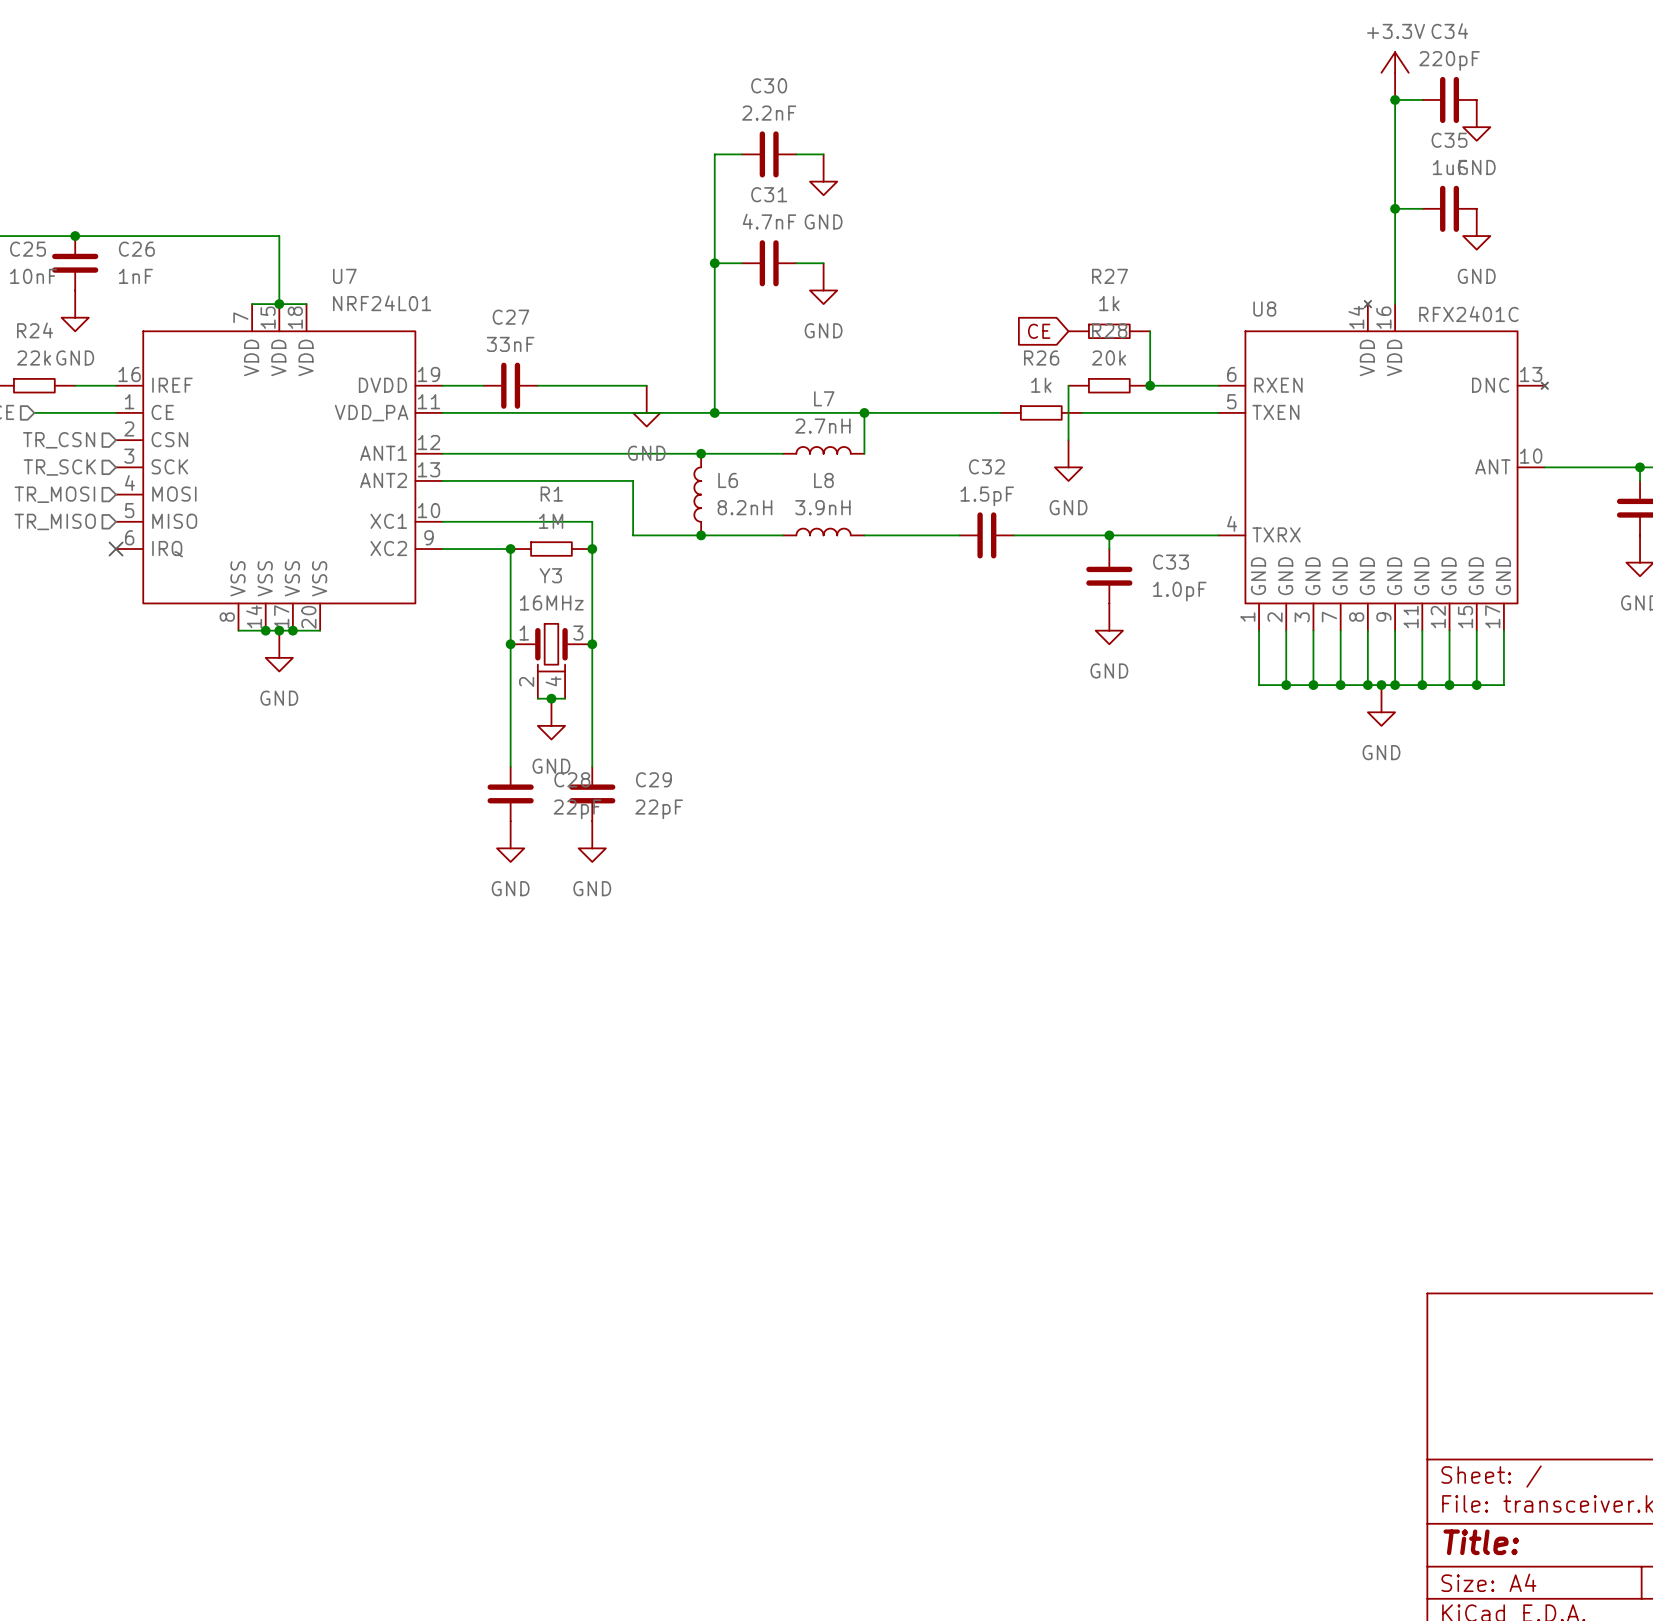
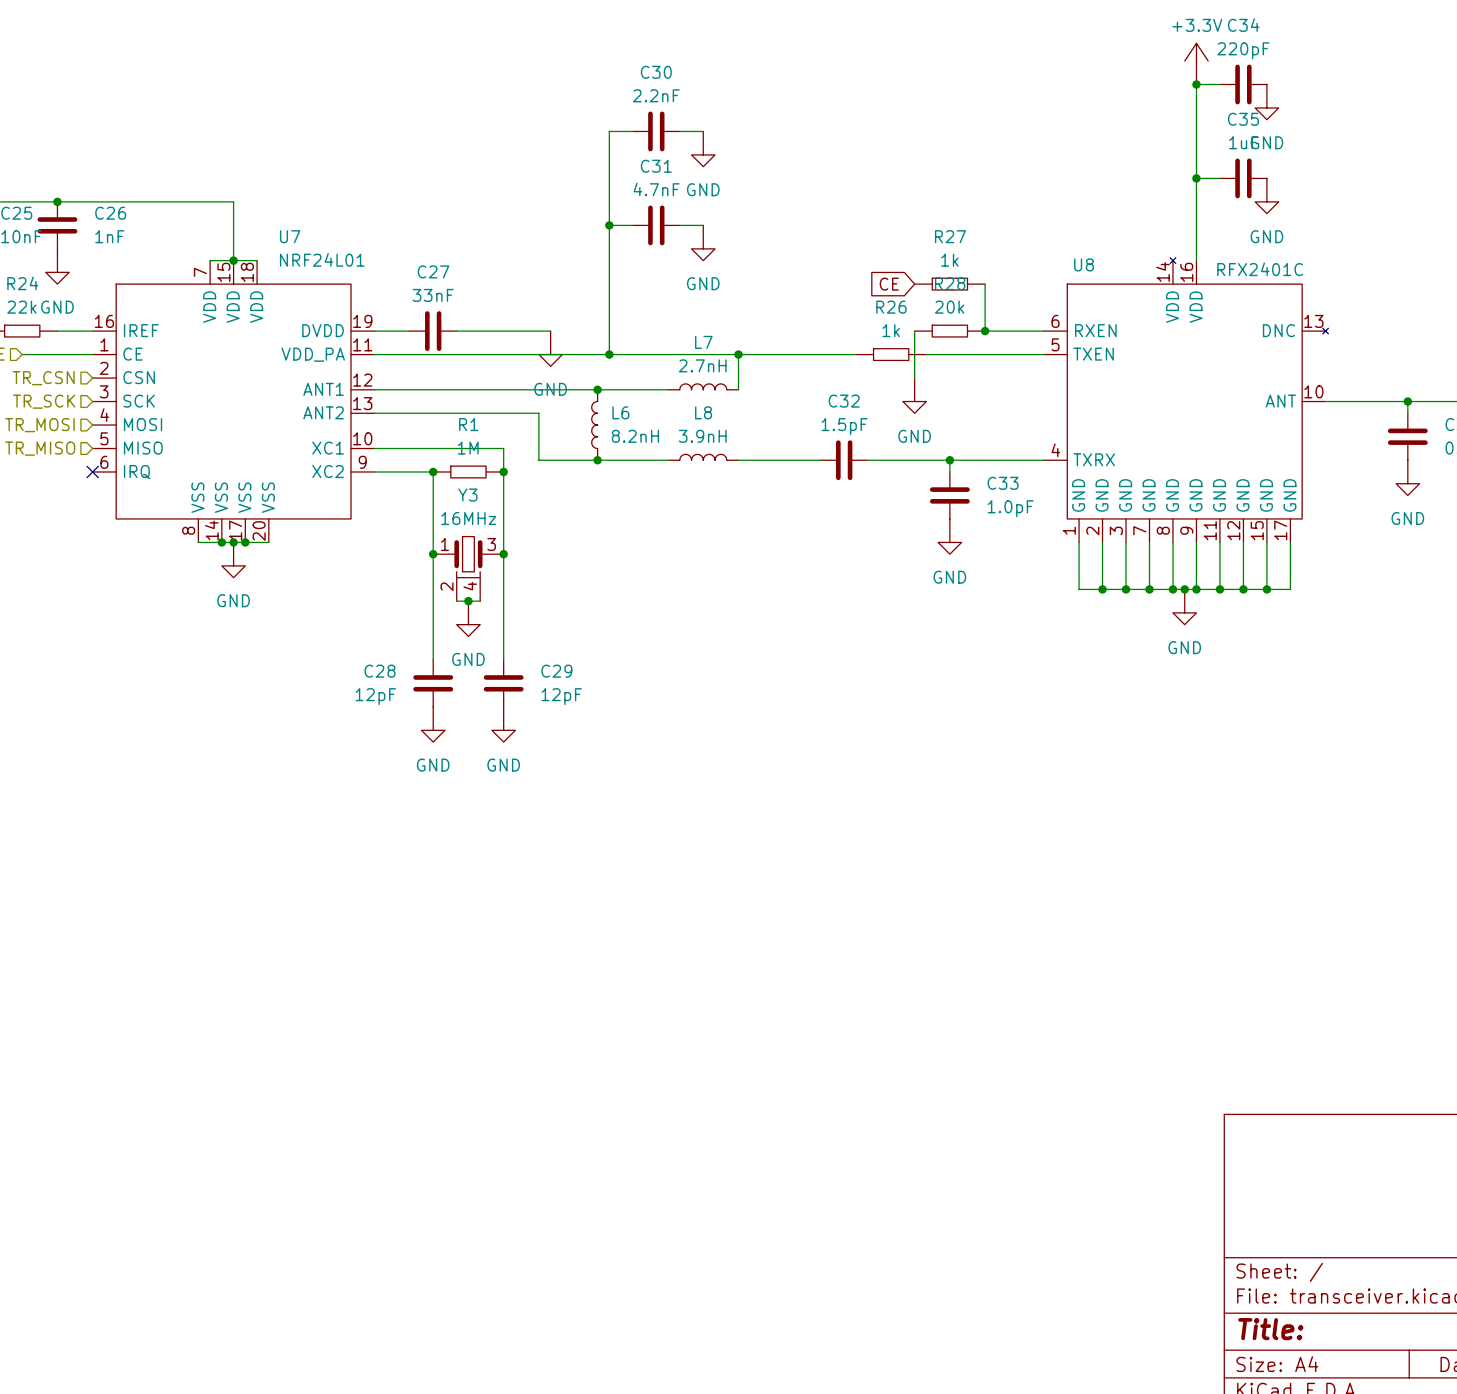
C28 name position: C28 (572, 779) -> C28 (380, 671)
C28 value: 22pF (577, 809) -> 12pF (375, 696)
C29 value: 22pF (659, 809) -> 12pF (561, 696)

